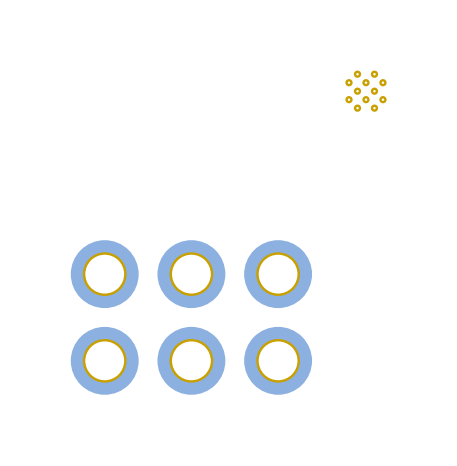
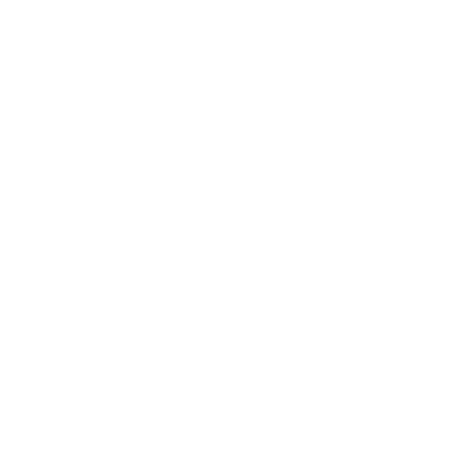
part: (365, 91) -> none
part: (104, 274) -> none
part: (191, 274) -> none
part: (278, 274) -> none
part: (104, 360) -> none
part: (191, 360) -> none
part: (278, 360) -> none

